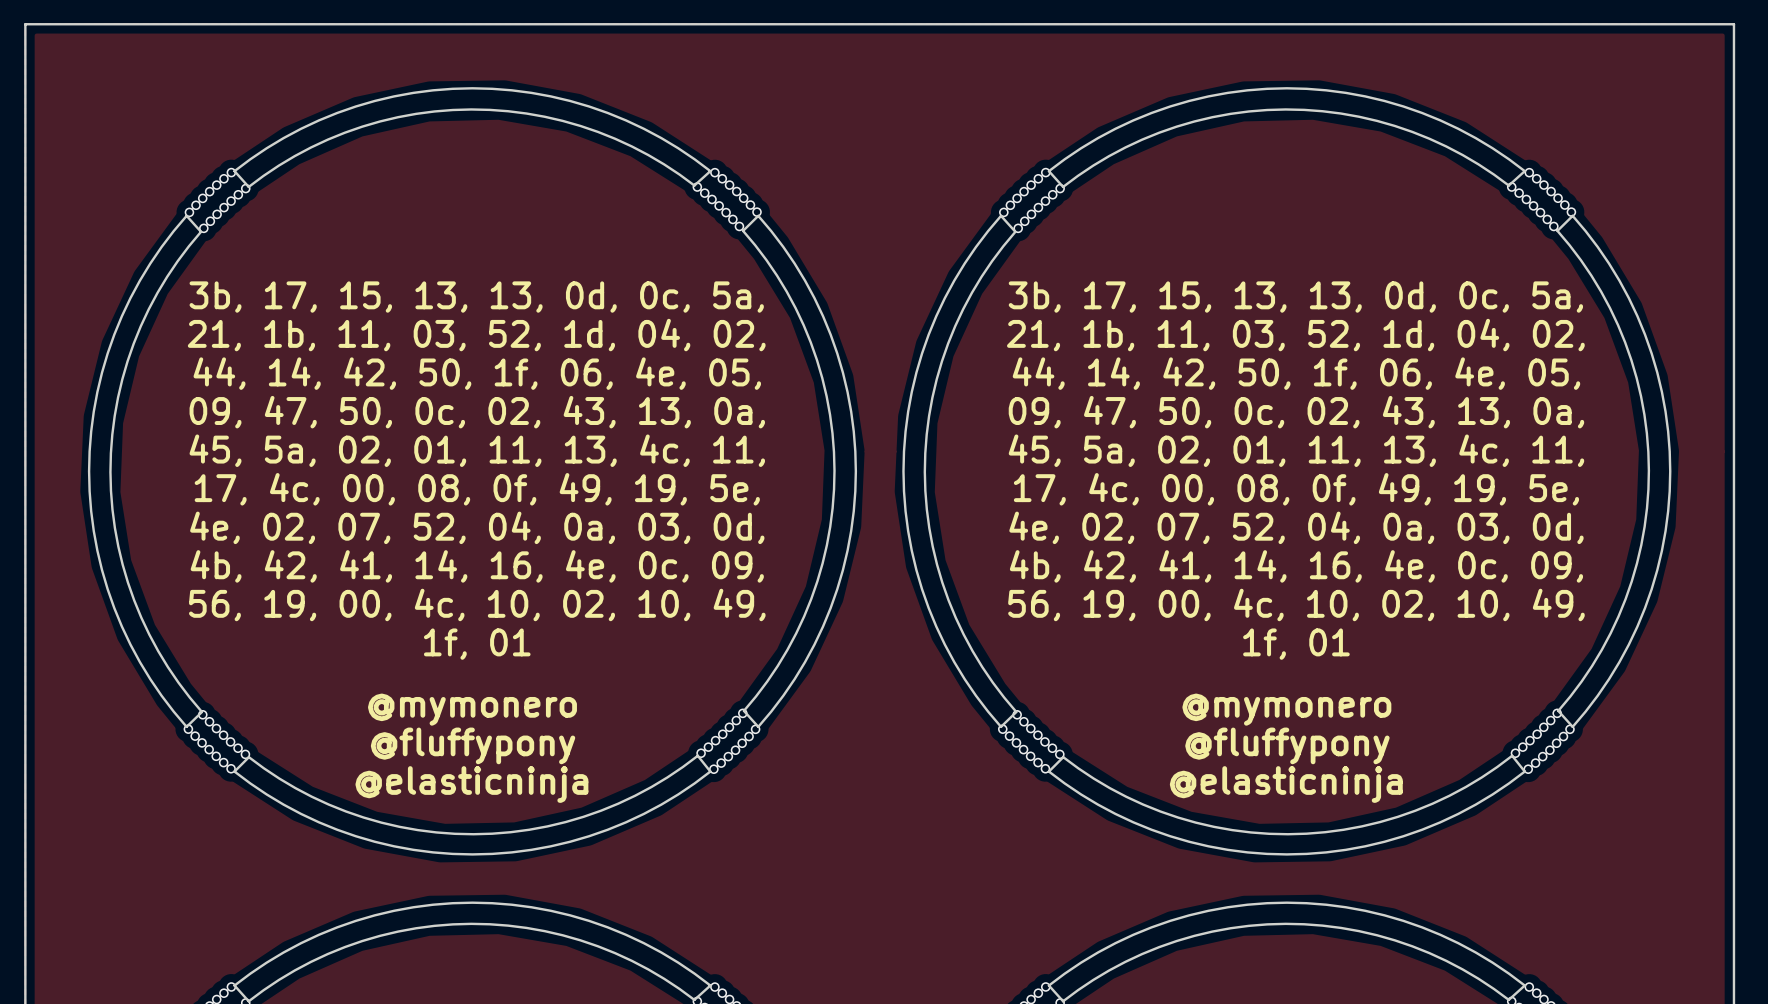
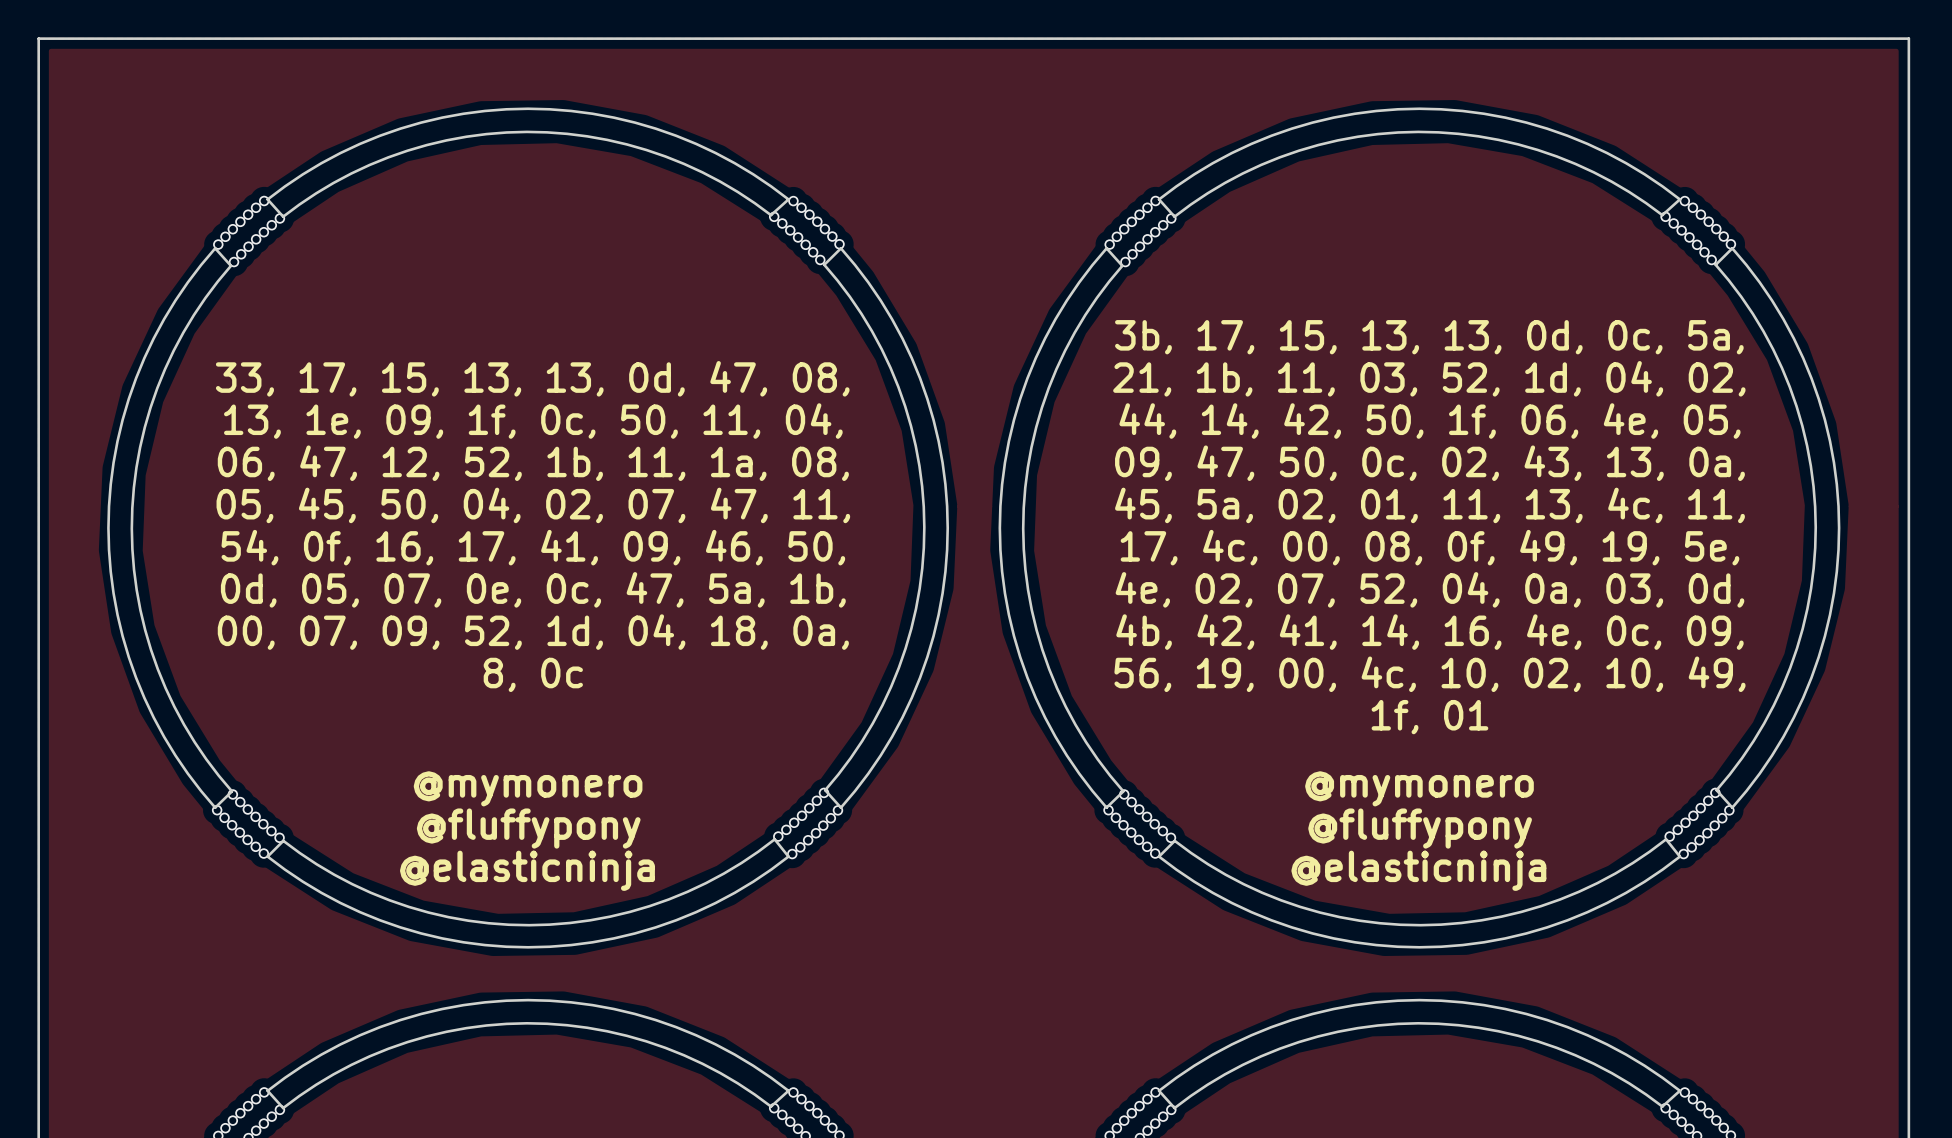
text: 3b, 17, 15, 13, 13, 0d, 0c, 5a, (476, 297) -> none
text: 21, 1b, 11, 03, 52, 1d, 04, 02, (476, 335) -> 33, 17, 15, 13, 13, 0d, 47, 08, (532, 378)
text: 44, 14, 42, 50, 1f, 06, 4e, 05, (477, 373) -> 13, 1e, 09, 1f, 0c, 50, 11, 04, (533, 421)
text: 09, 47, 50, 0c, 02, 43, 13, 0a, (477, 412) -> 06, 47, 12, 52, 1b, 11, 1a, 08, (533, 463)
text: 45, 5a, 02, 01, 11, 13, 4c, 11, (477, 450) -> 05, 45, 50, 04, 02, 07, 47, 11, (533, 505)
text: 17, 4c, 00, 08, 0f, 49, 19, 5e, (477, 489) -> 54, 0f, 16, 17, 41, 09, 46, 50, (533, 547)
text: 4e, 02, 07, 52, 04, 0a, 03, 0d, (477, 527) -> 0d, 05, 07, 0e, 0c, 47, 5a, 1b, (533, 589)
text: 4b, 42, 41, 14, 16, 4e, 0c, 09, (477, 566) -> 00, 07, 09, 52, 1d, 04, 18, 0a, (533, 632)
text: 56, 19, 00, 4c, 10, 02, 10, 49, (477, 604) -> 8, 0c (533, 674)
text: 1f, 01 (477, 644) -> none

